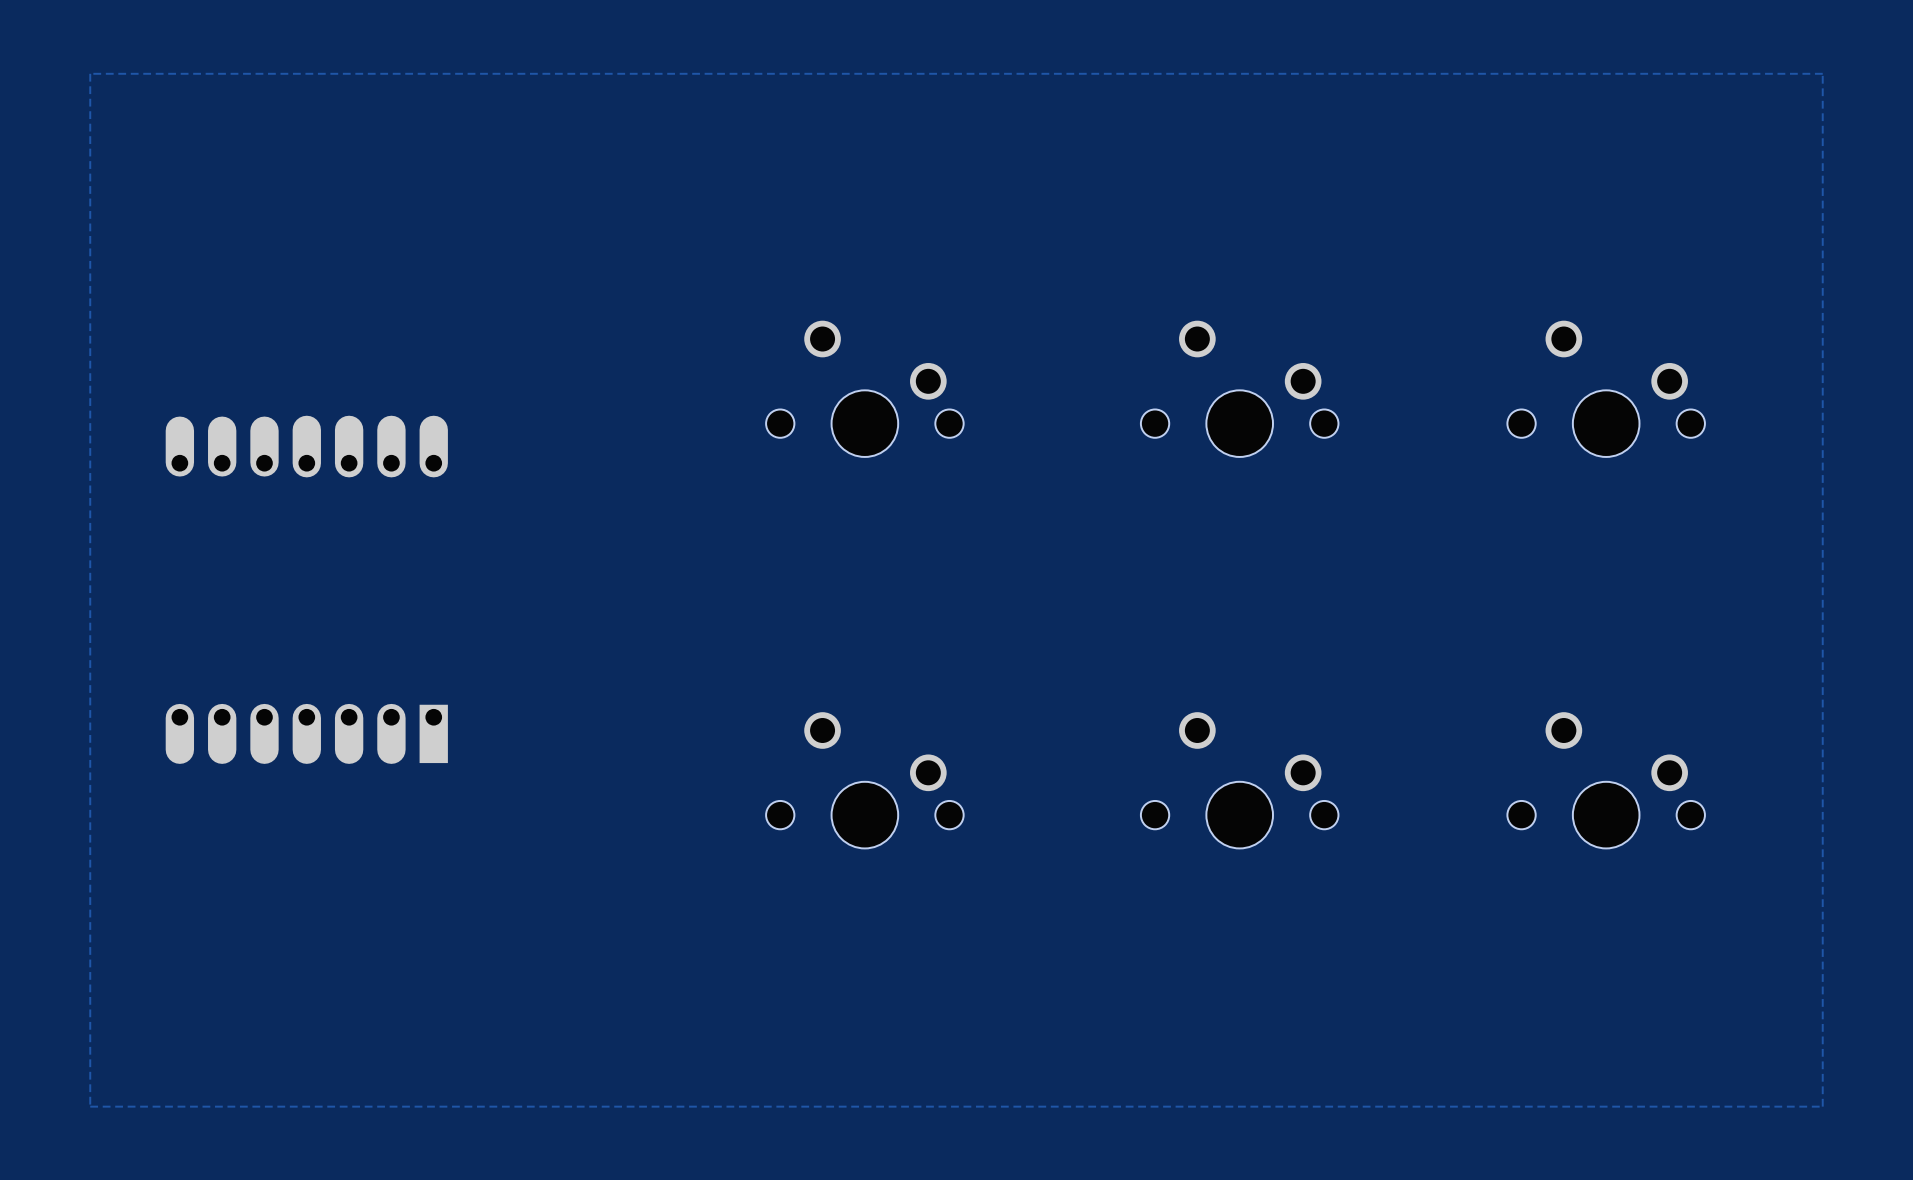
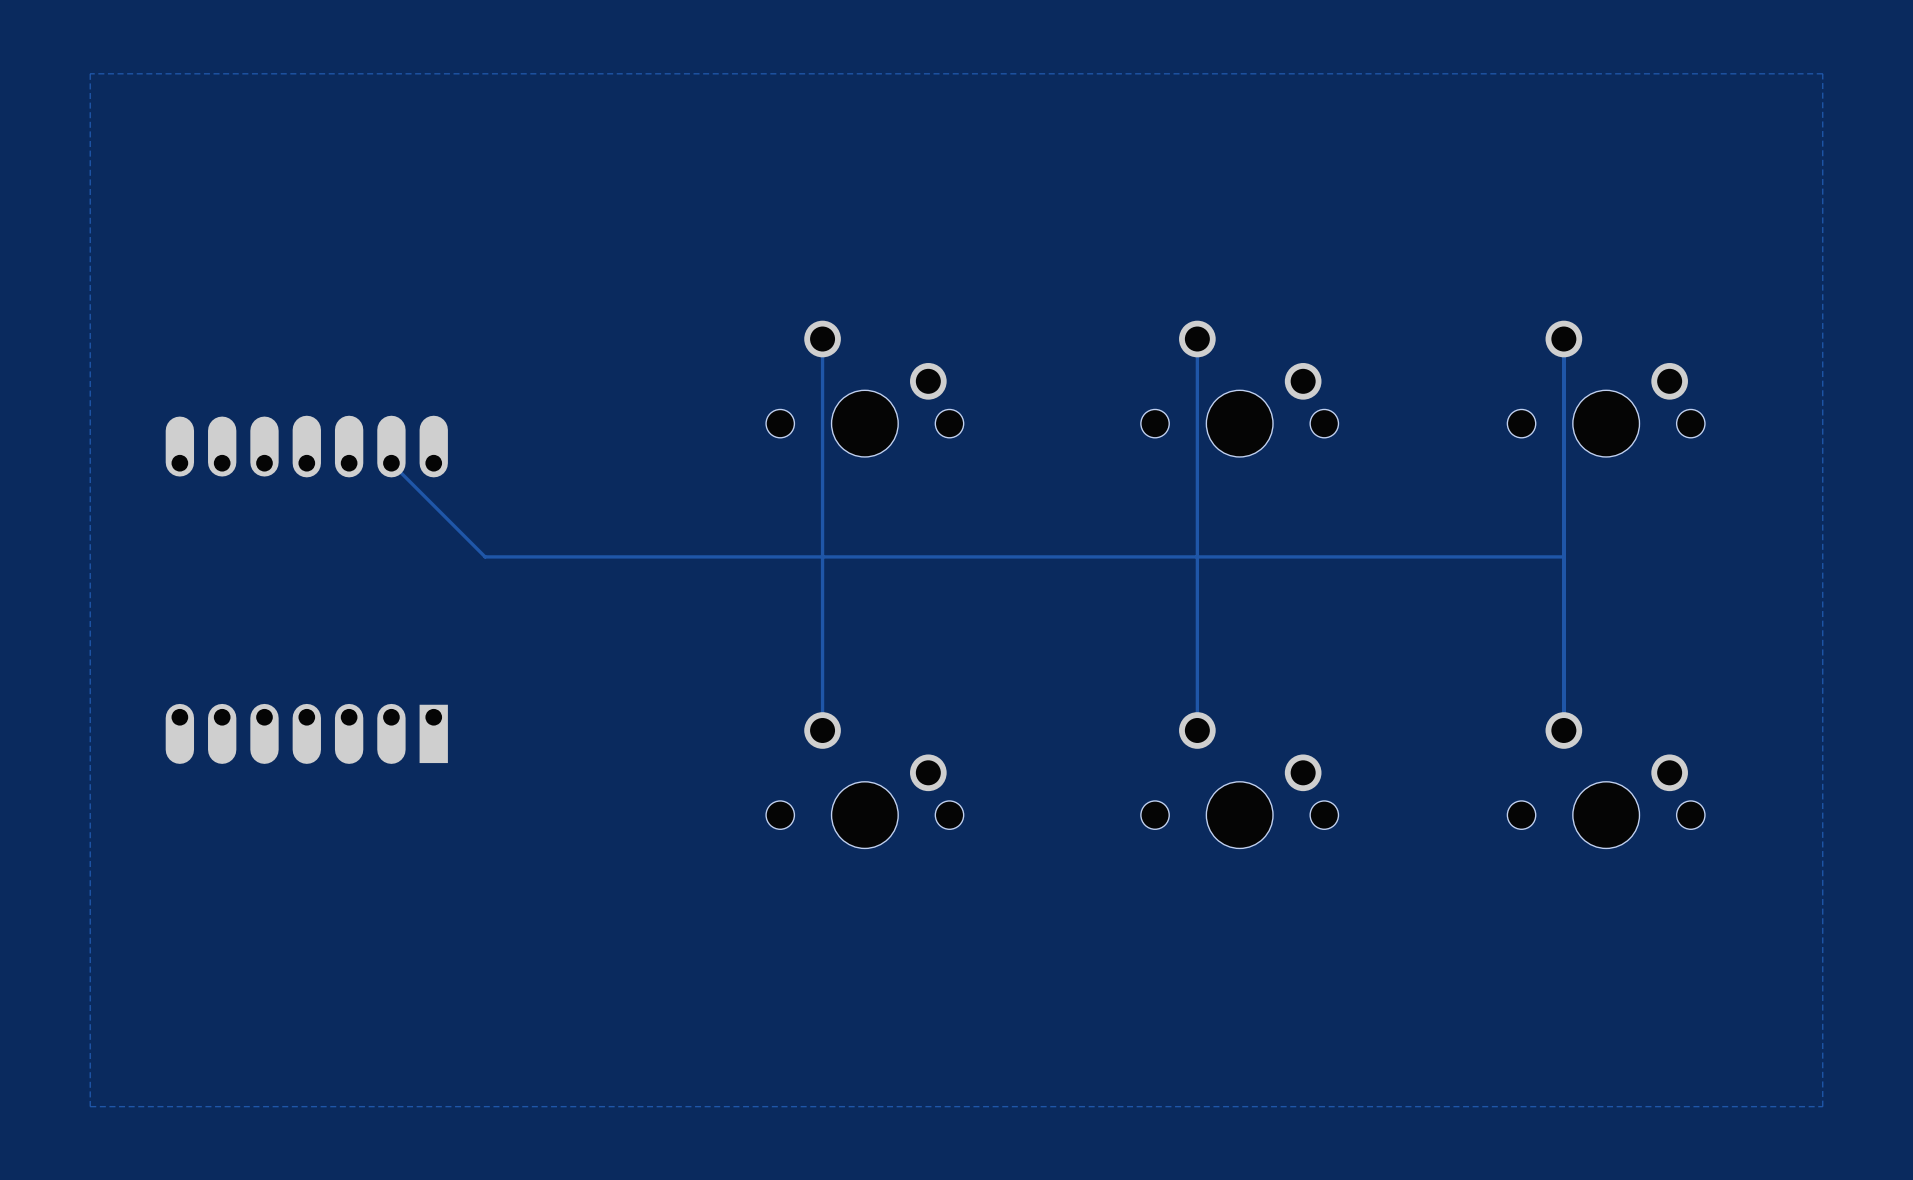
track: none -> (822, 339) (822, 730)
track: none -> (1197, 339) (1197, 730)
track: none -> (1563, 339) (1563, 730)
track: none -> (391, 463) (485, 556) (1563, 556)

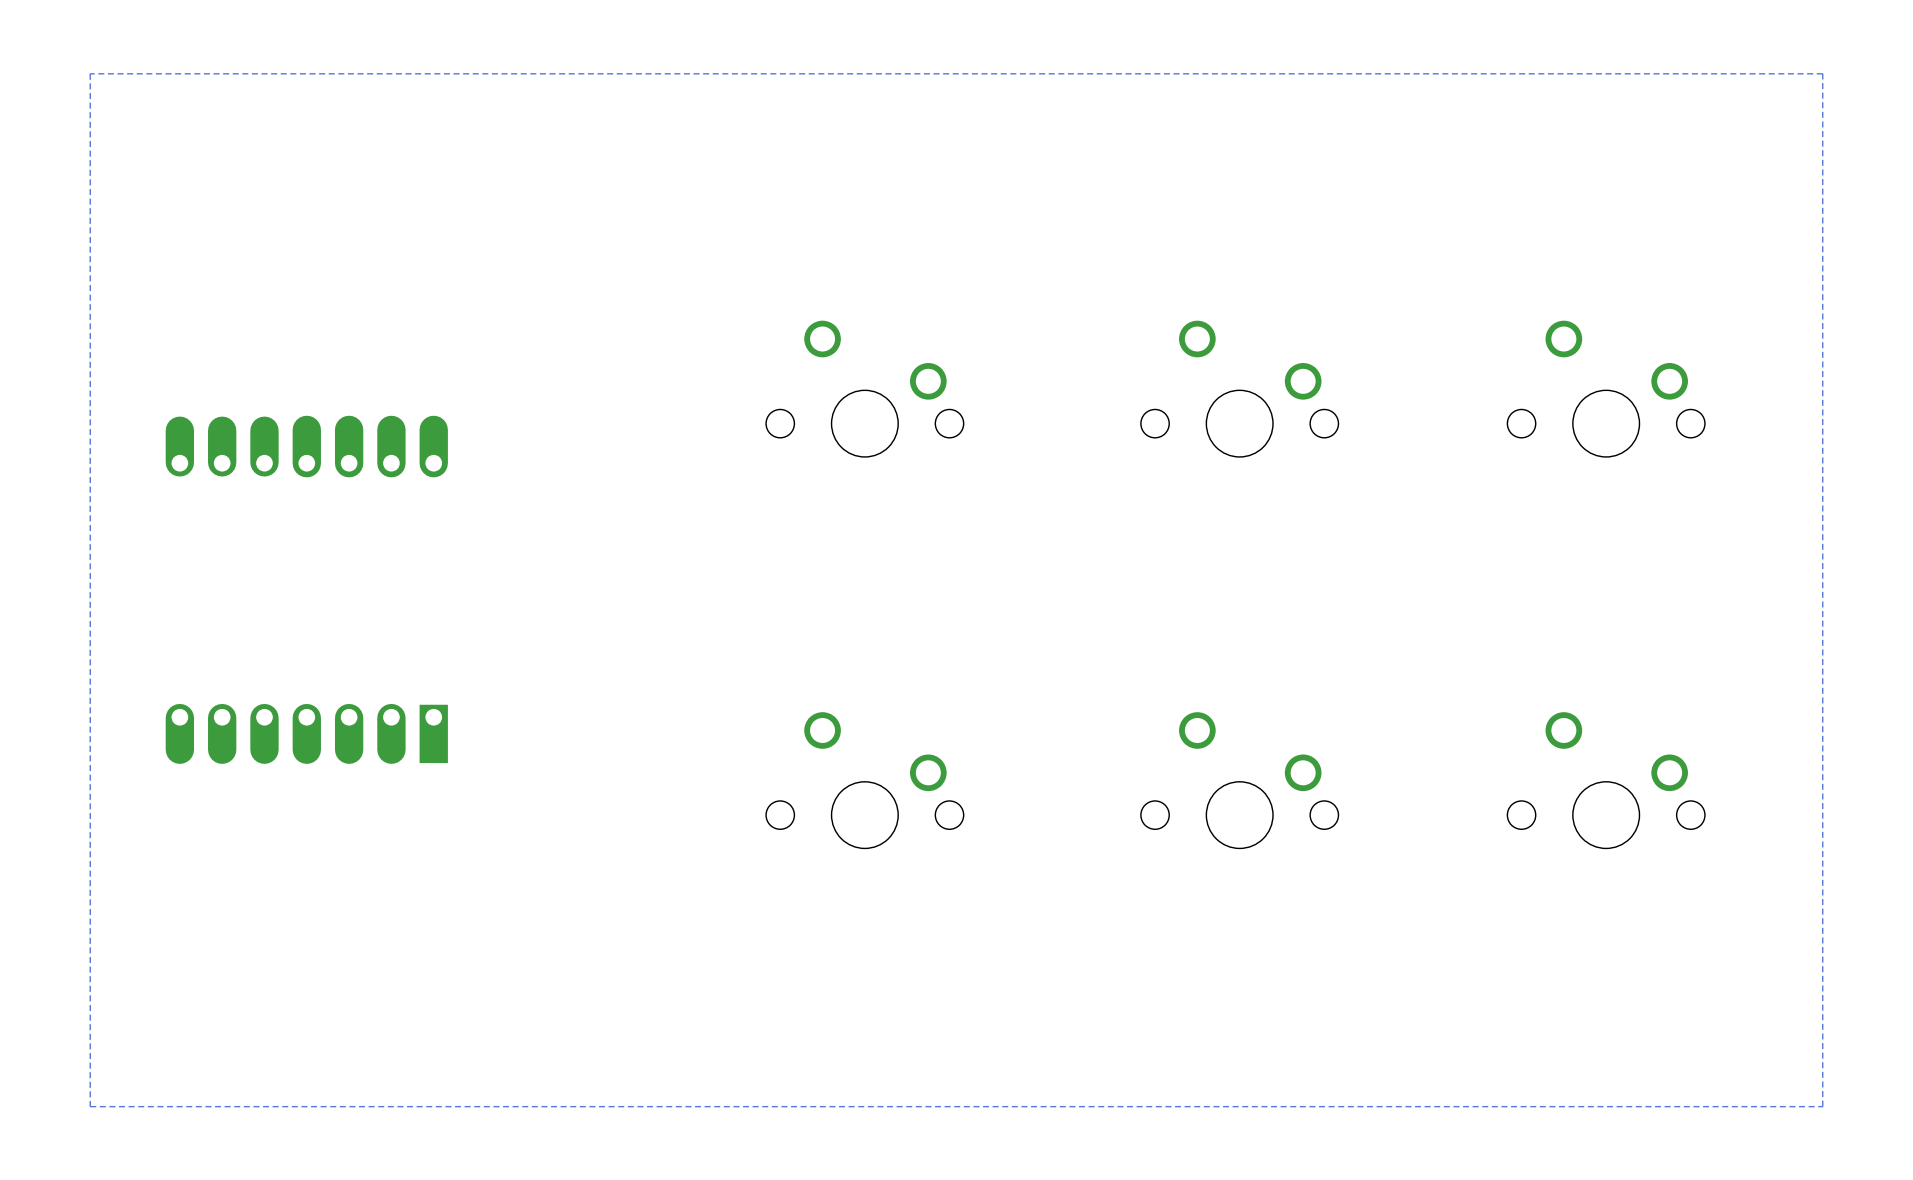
track: (822, 339) (822, 730) -> none
track: (1197, 339) (1197, 730) -> none
track: (1563, 339) (1563, 730) -> none
track: (391, 463) (485, 556) (1563, 556) -> none

